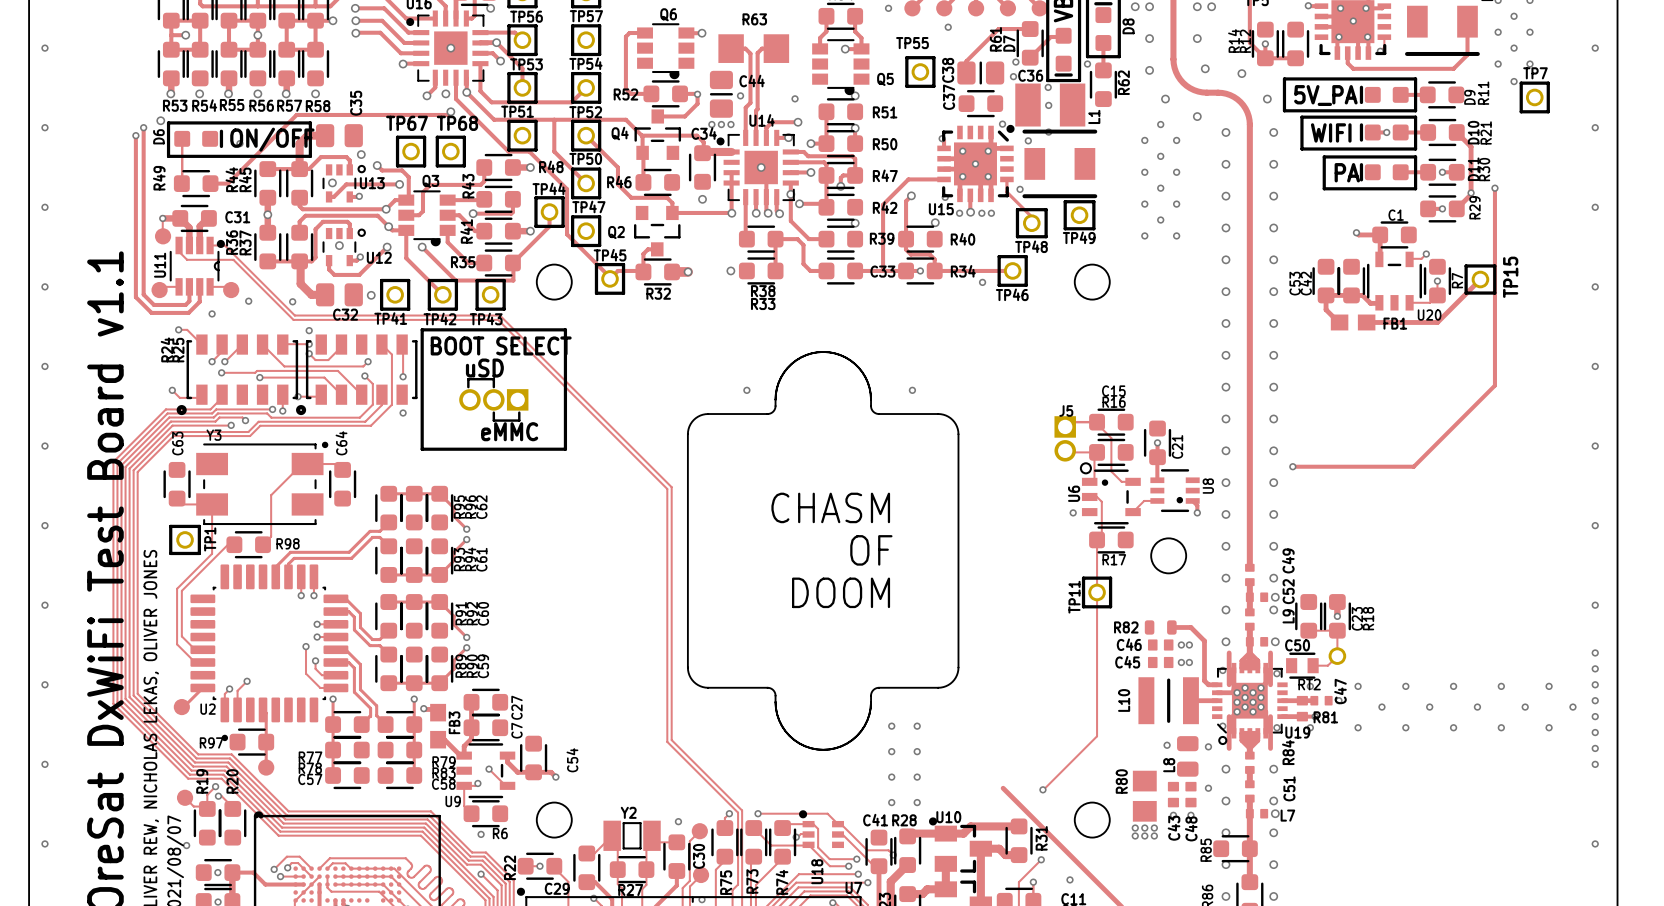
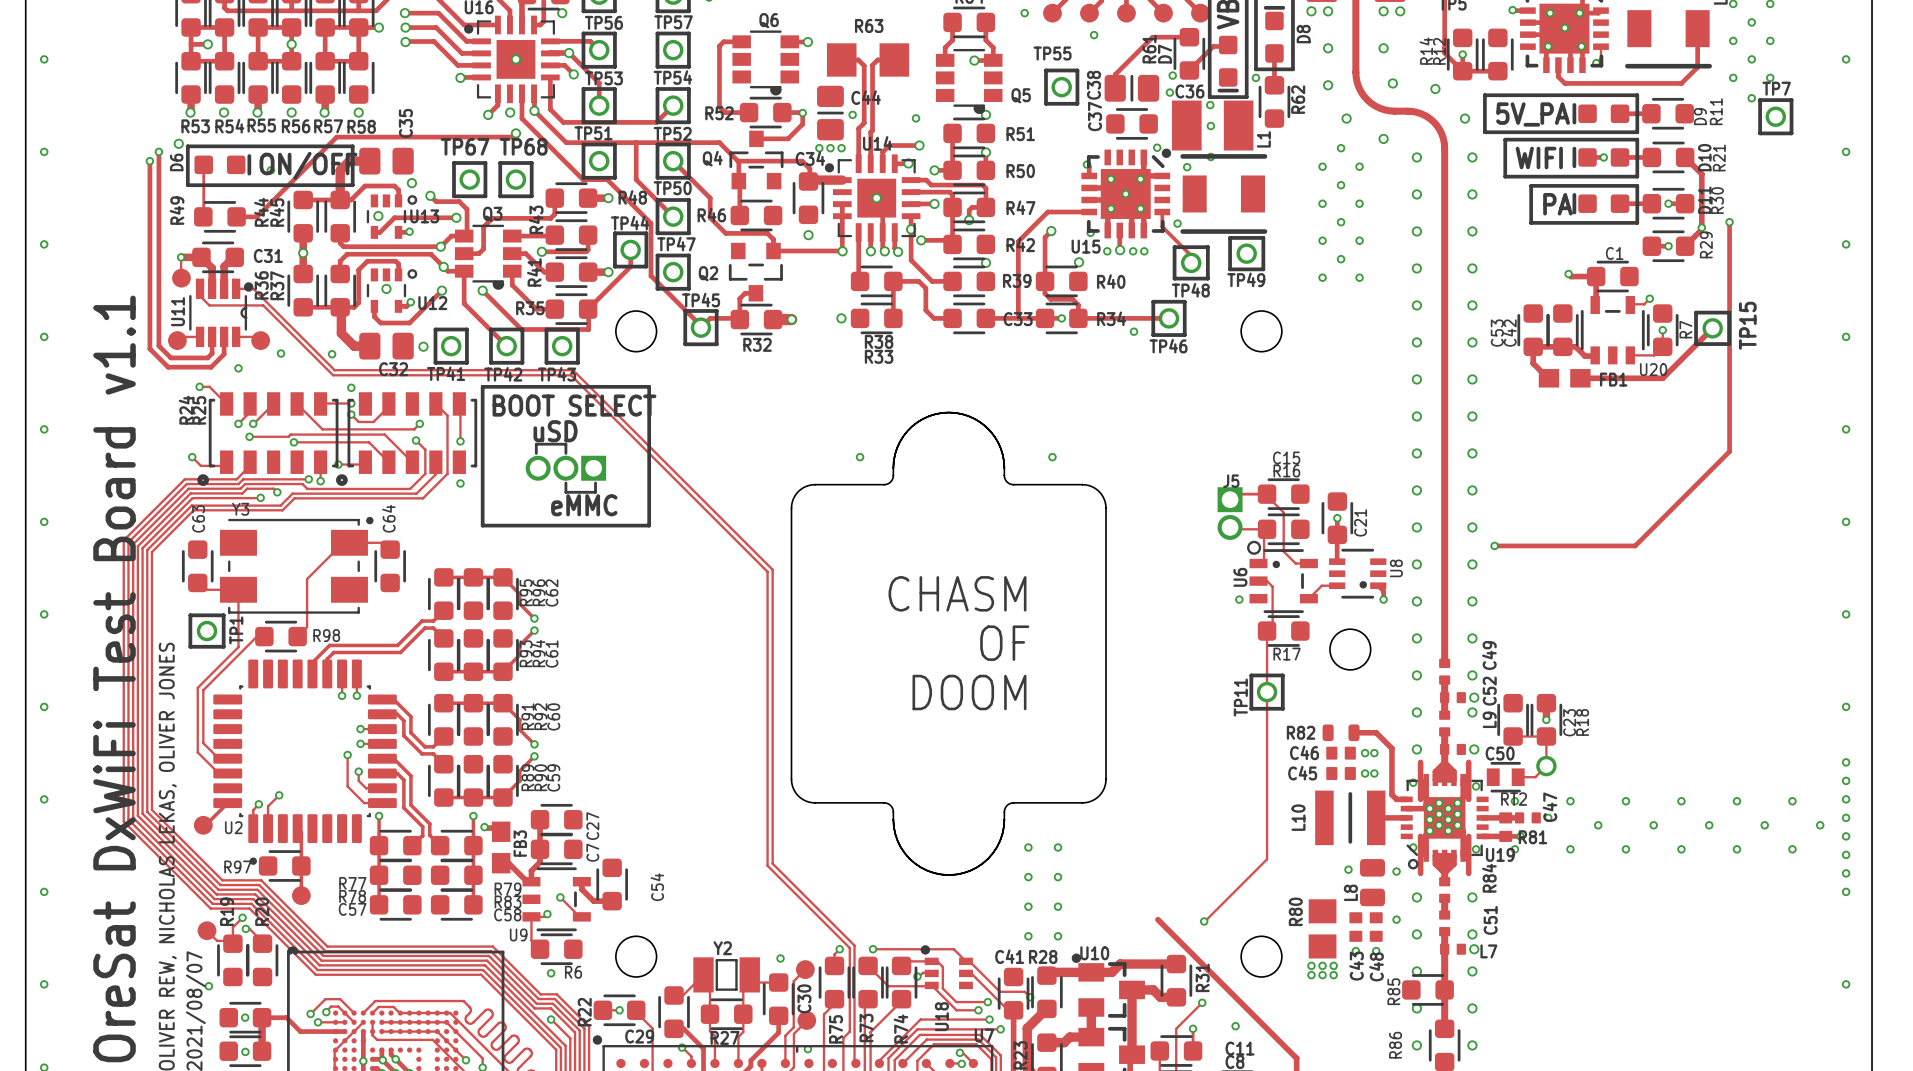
track: (533, 772) (551, 772) (555, 777) -> none
via: (555, 777) -> none

